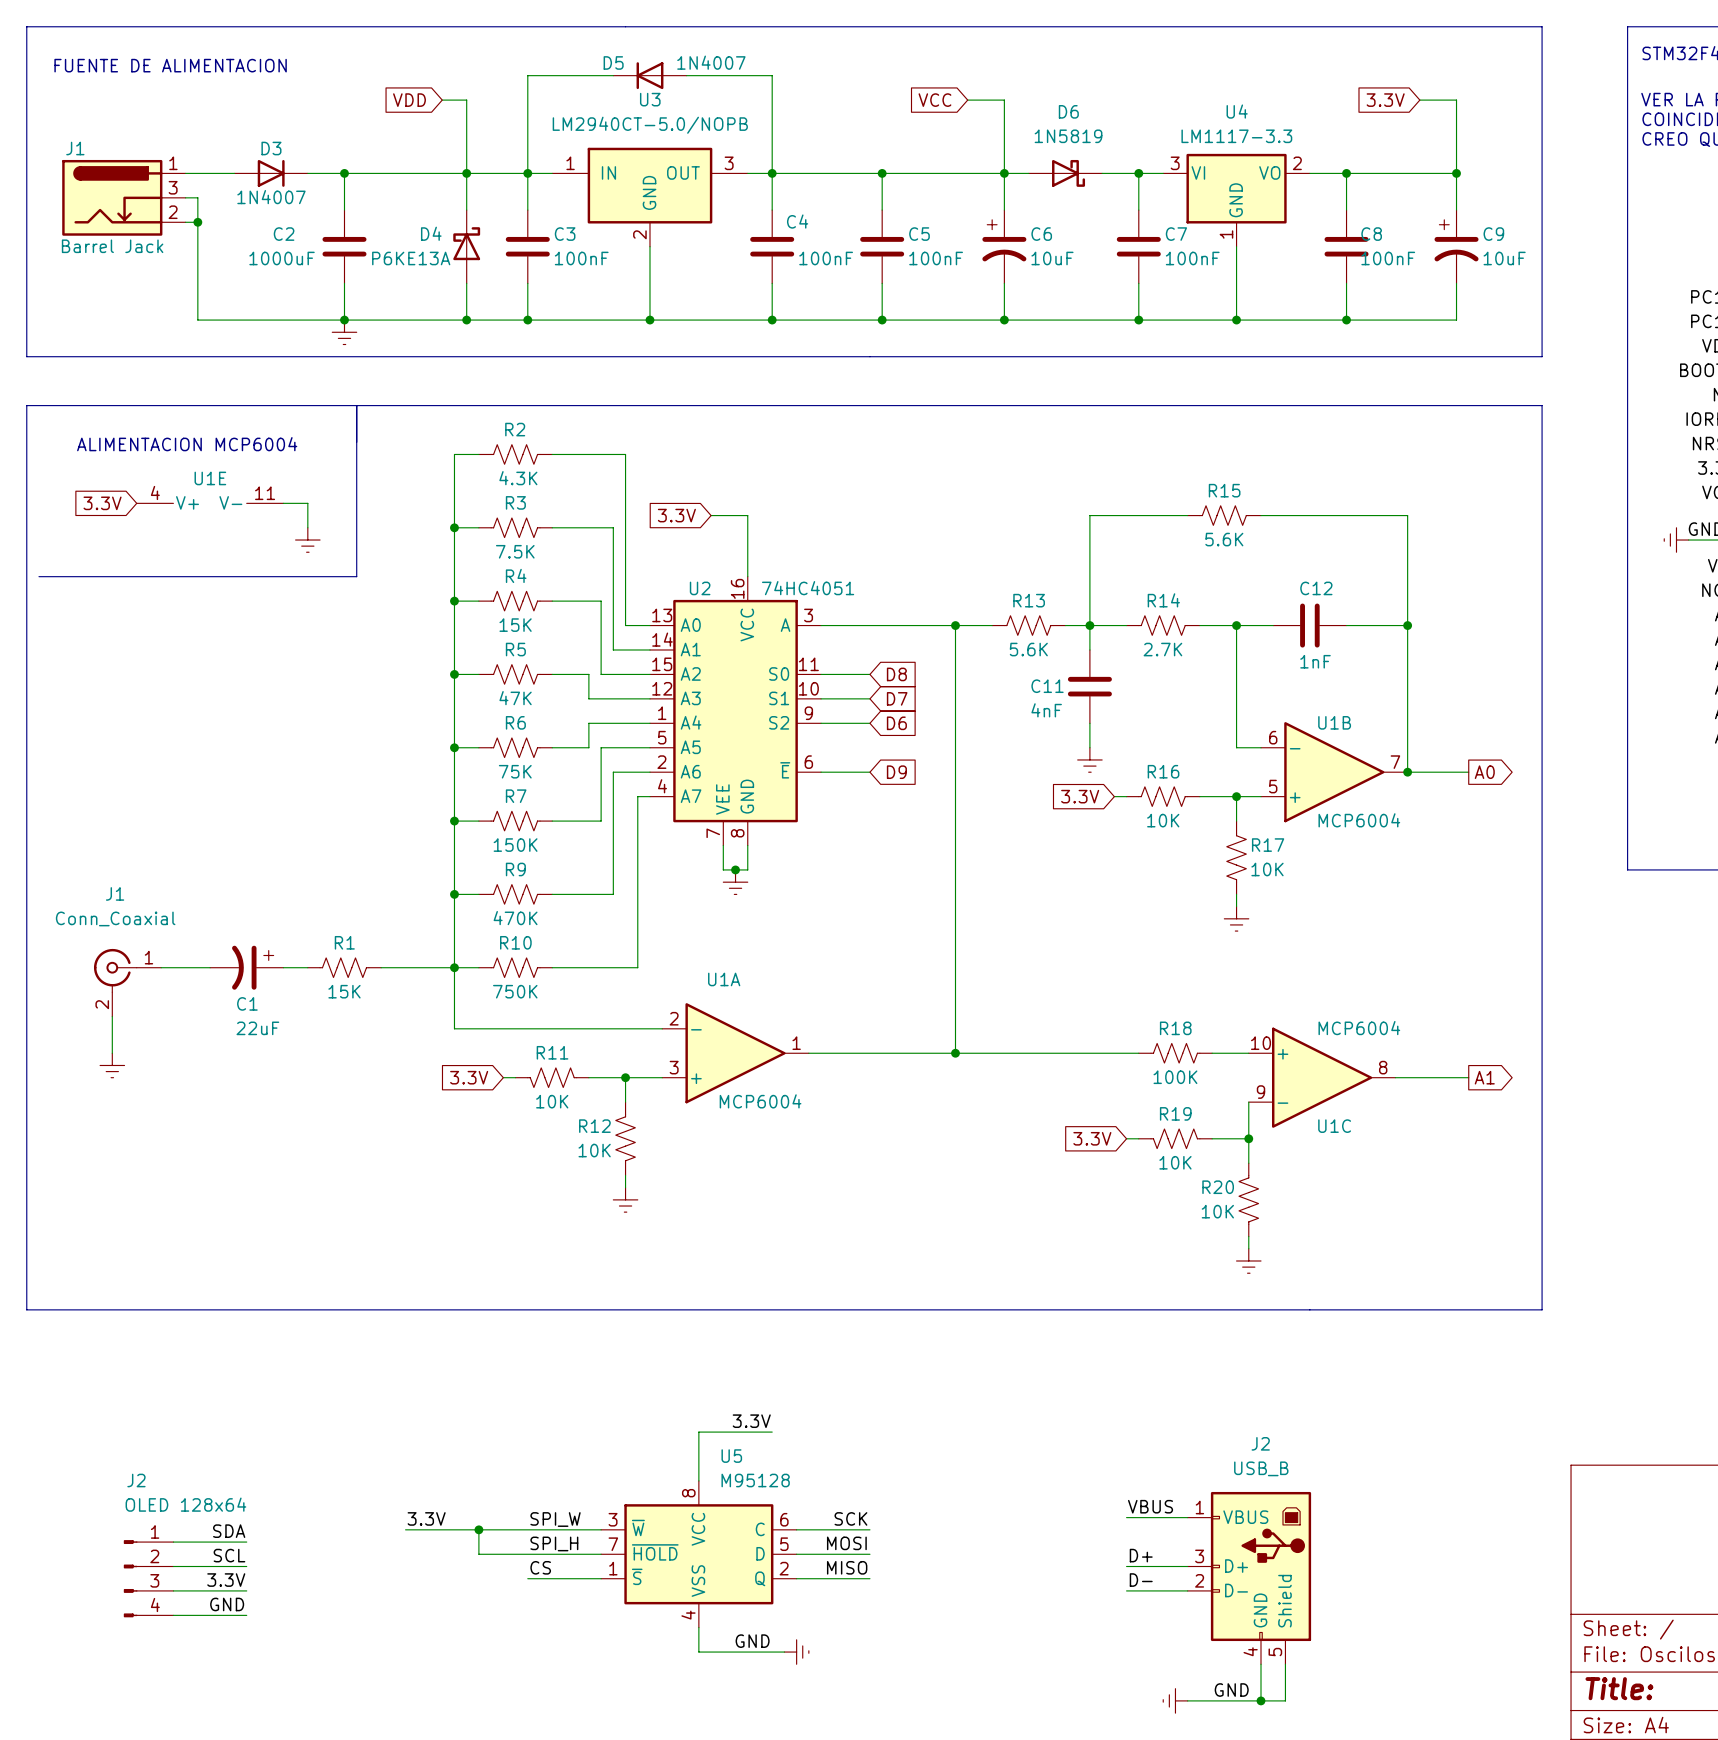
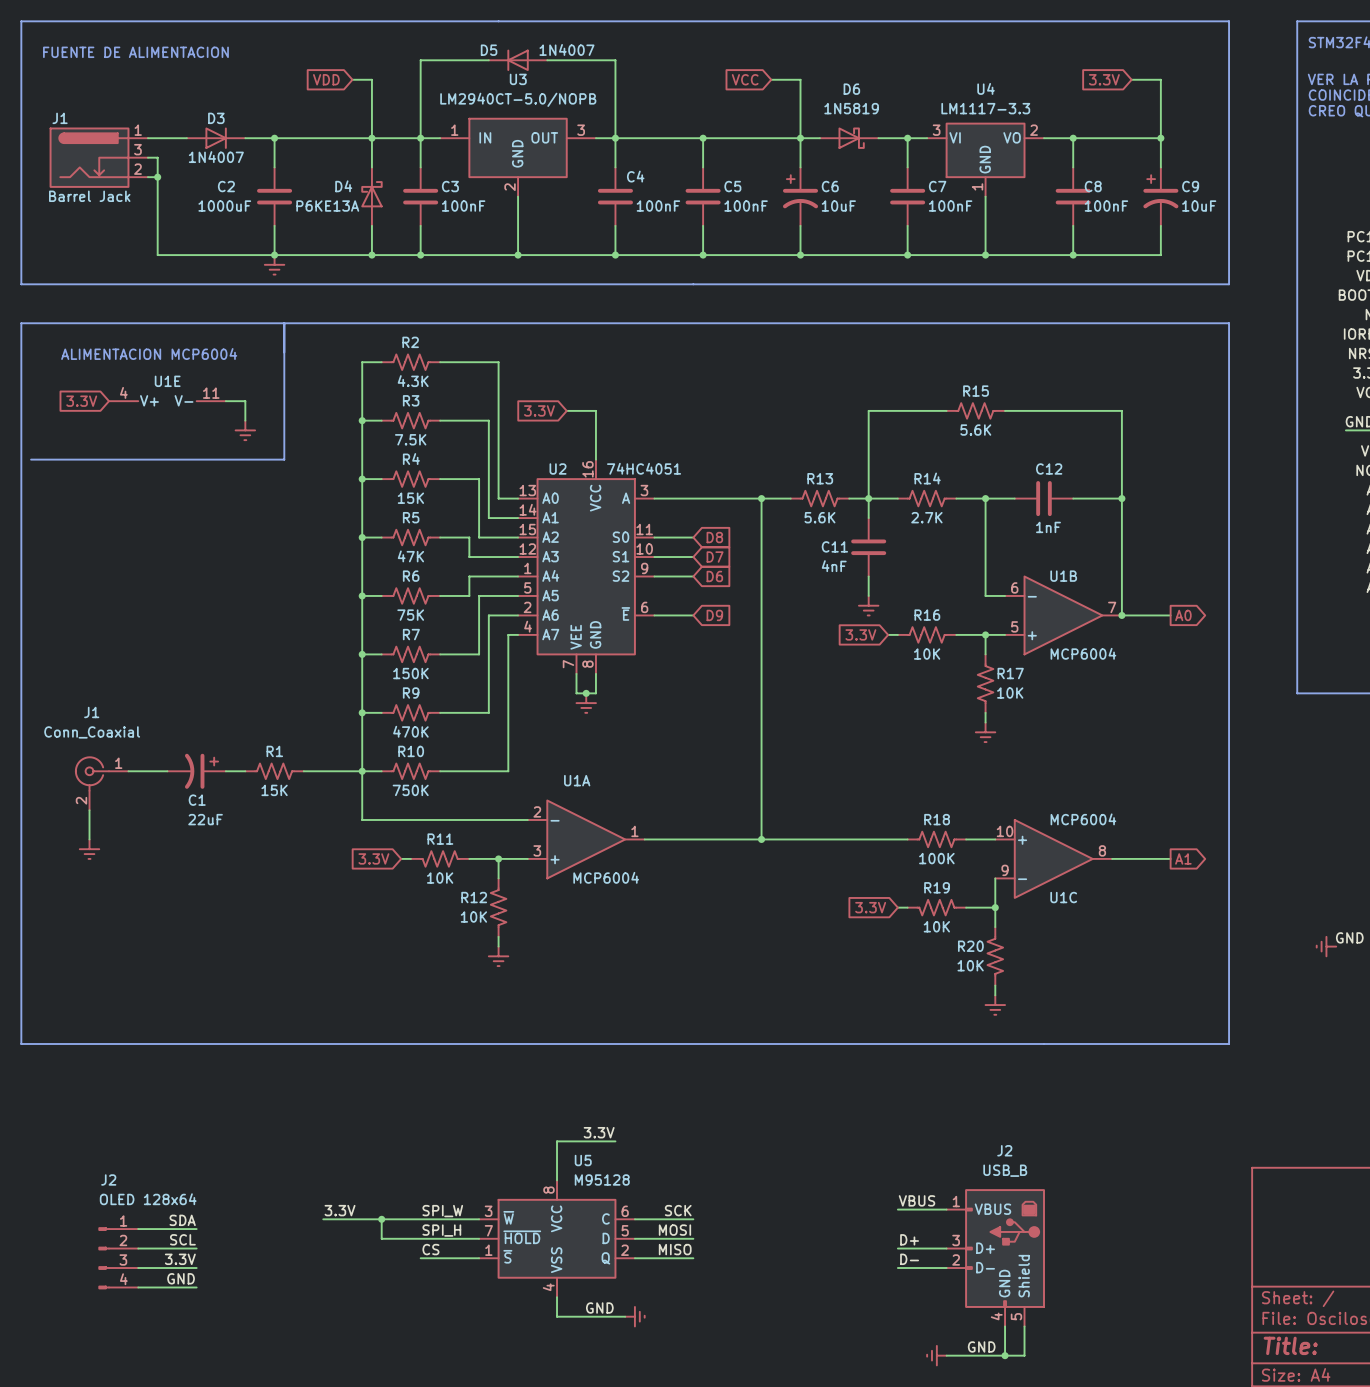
power symbol: (1676, 540) -> none
label: none -> GND (1349, 937)
power symbol: none -> (1326, 946)

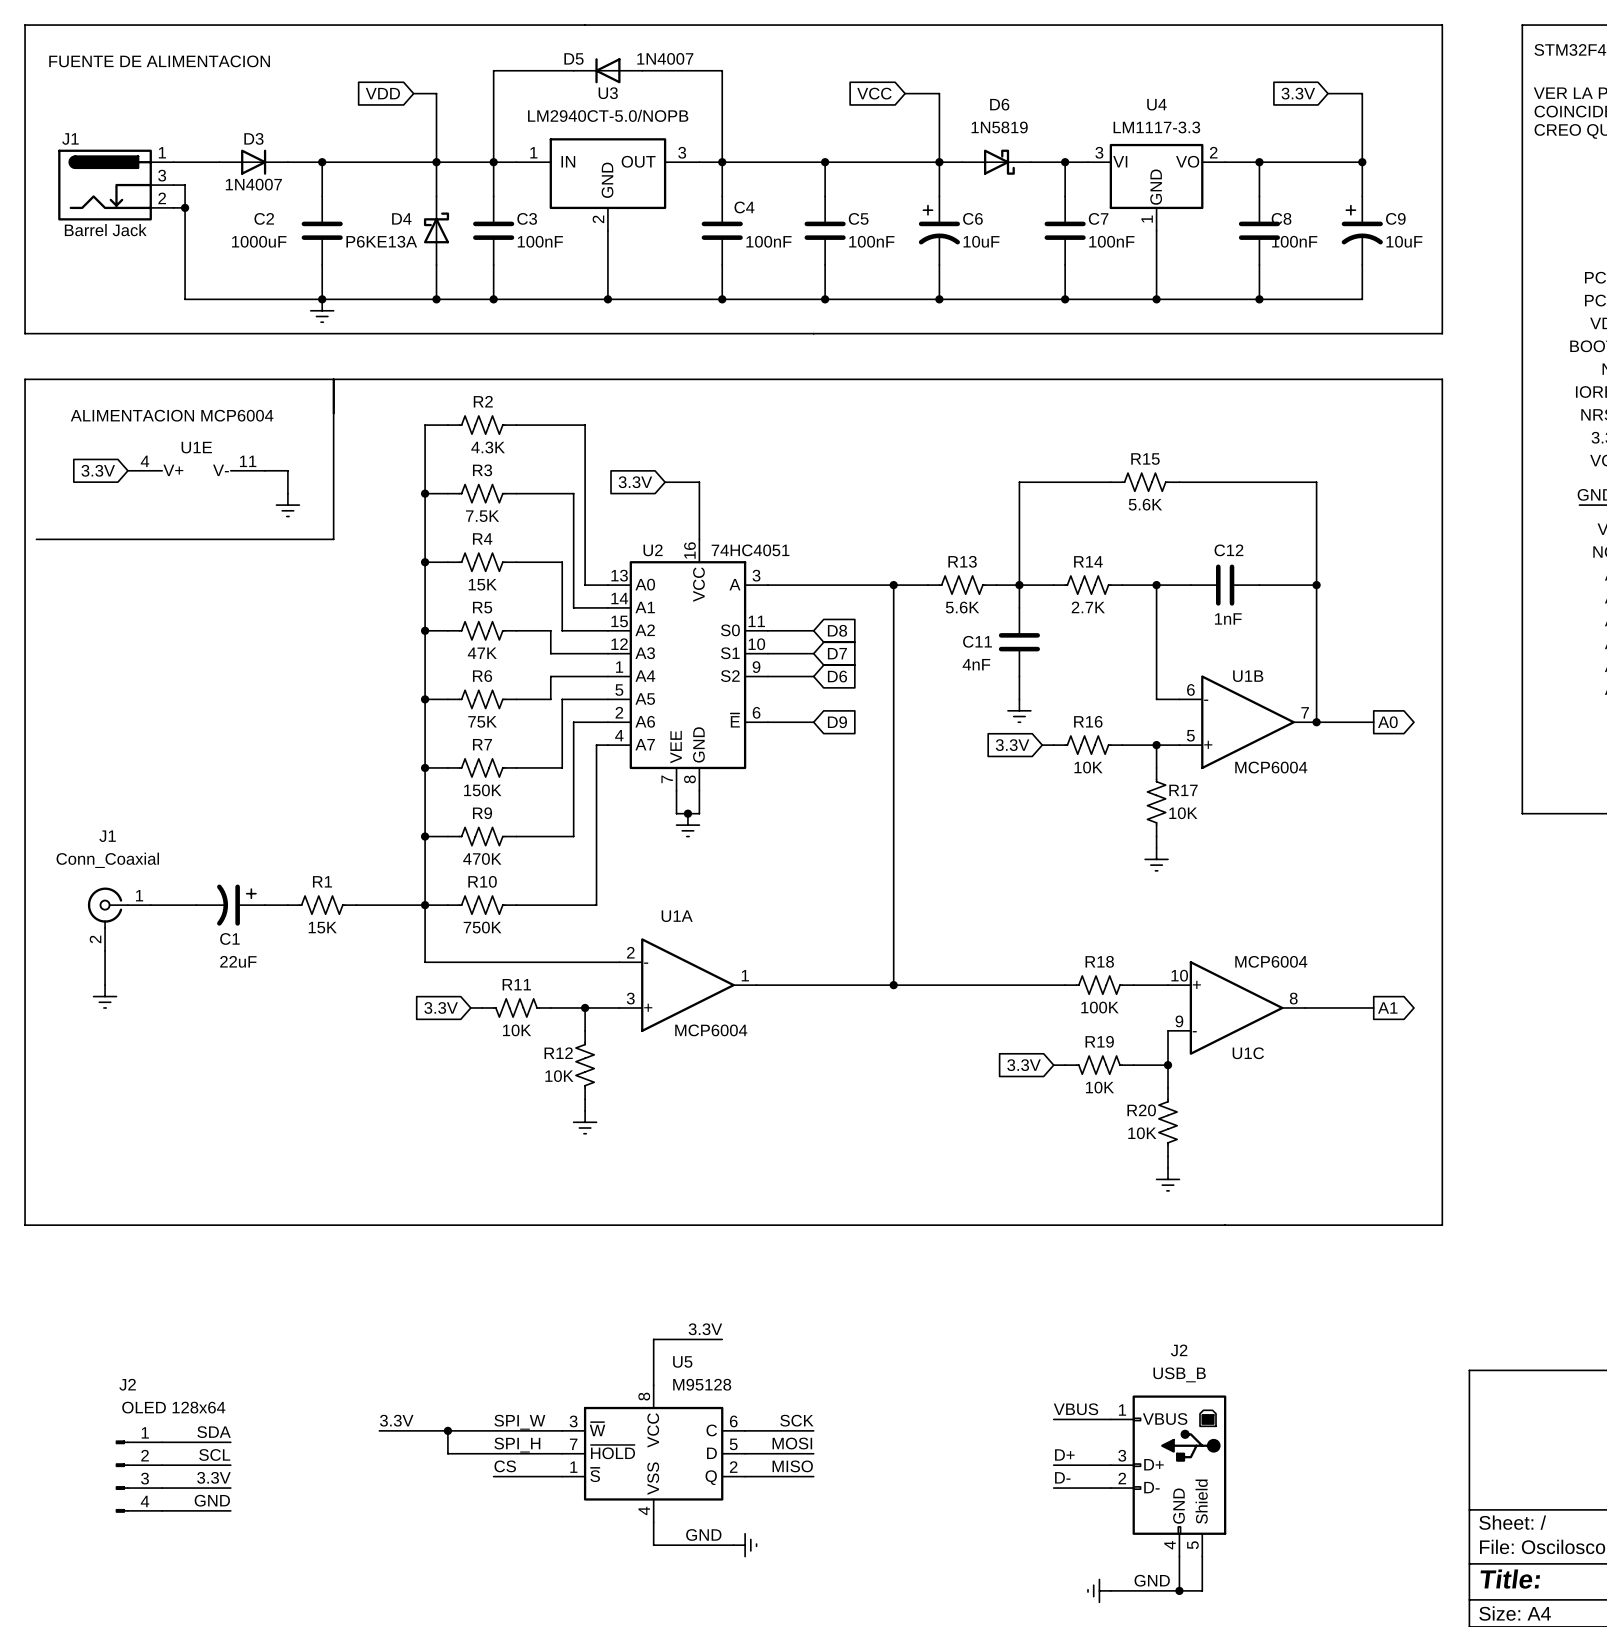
label: GND (1349, 937) -> none
power symbol: (1326, 946) -> none

